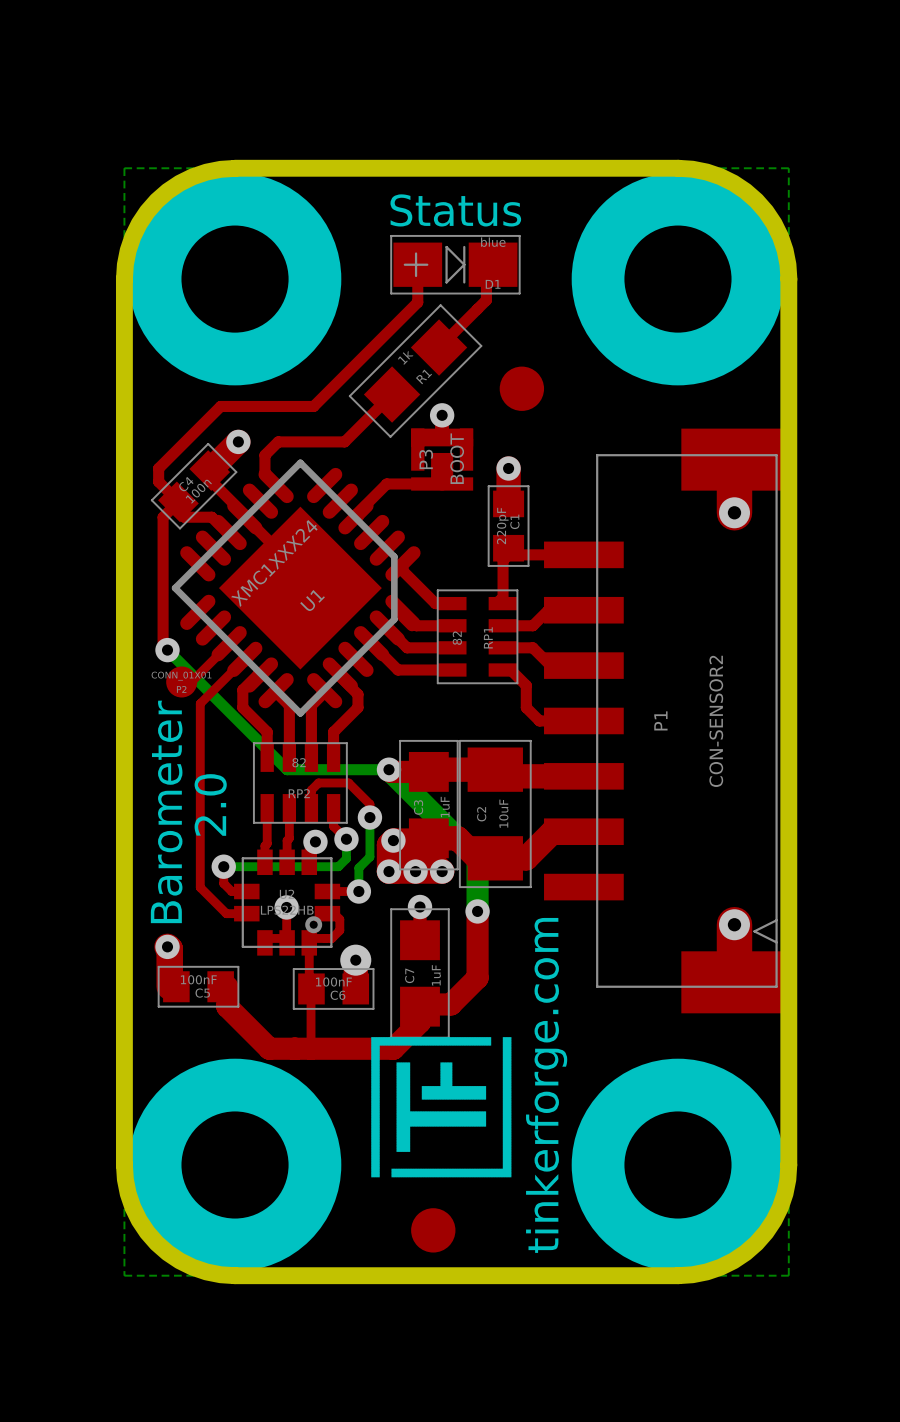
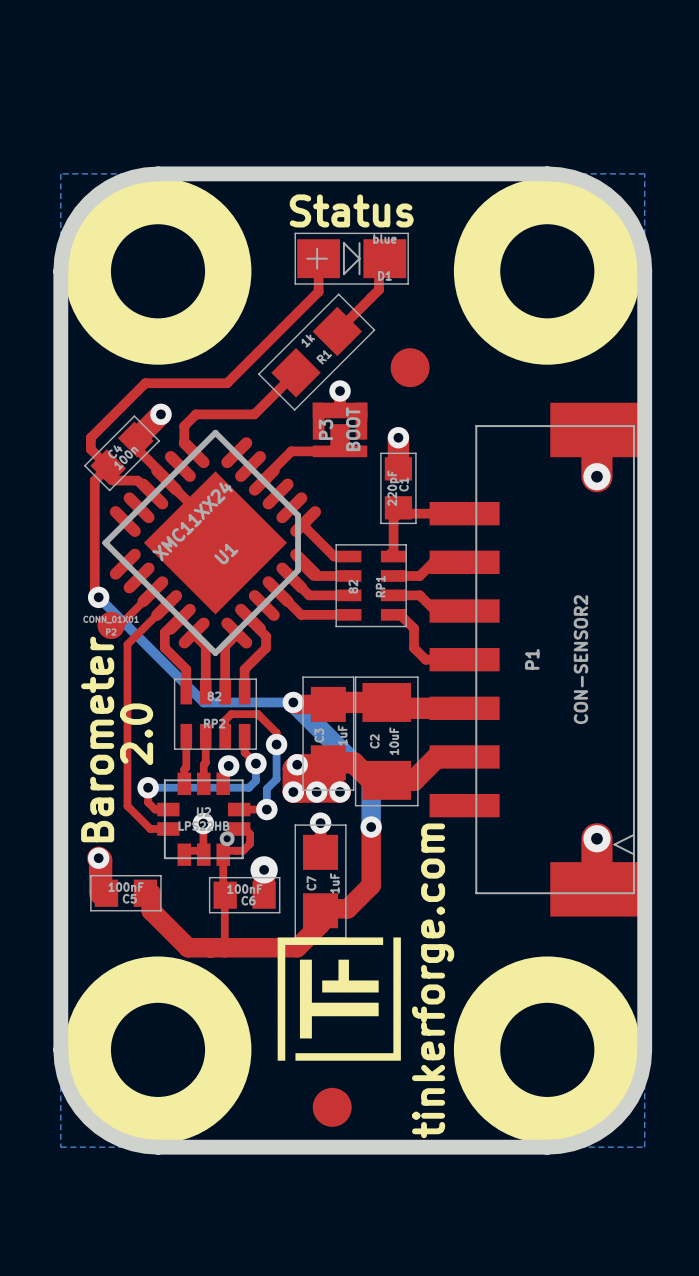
U1 value: XMC1XXX24 (274, 563) -> XMC11XX24 (192, 521)

